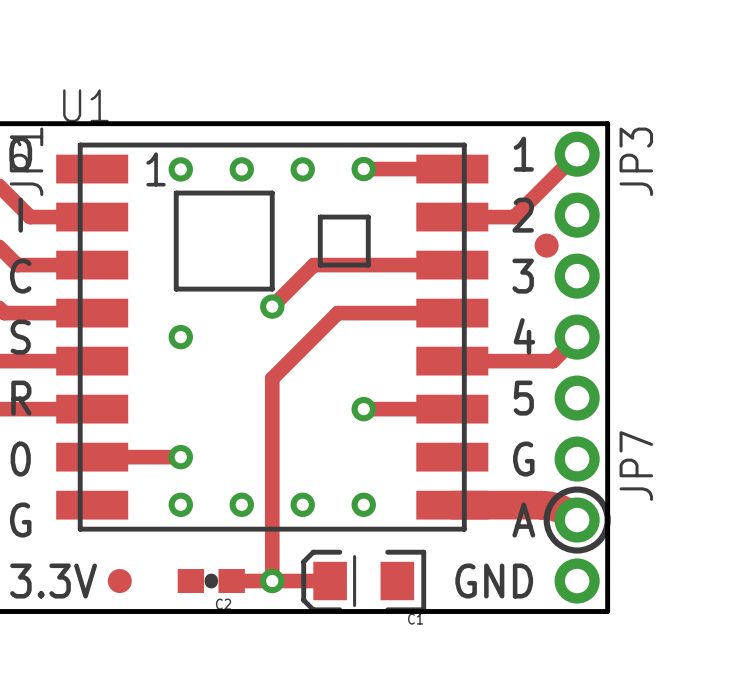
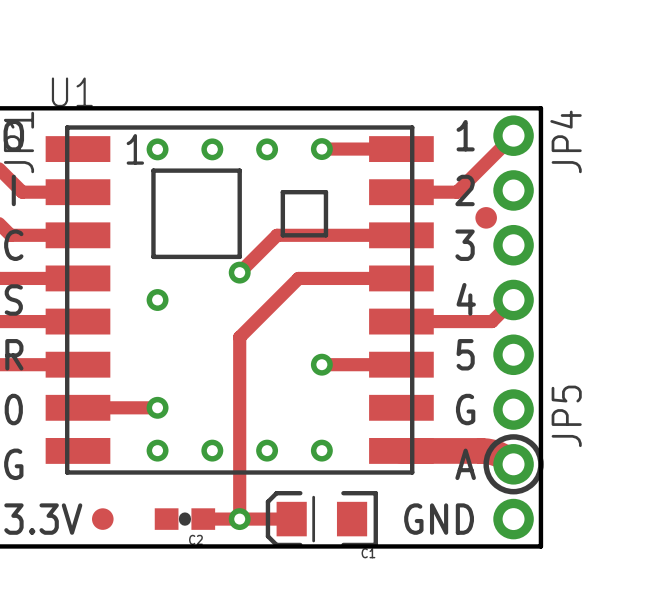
JP3 name: JP3 (636, 161) -> JP4 (566, 141)
JP7 name: JP7 (636, 465) -> JP5 (566, 416)

